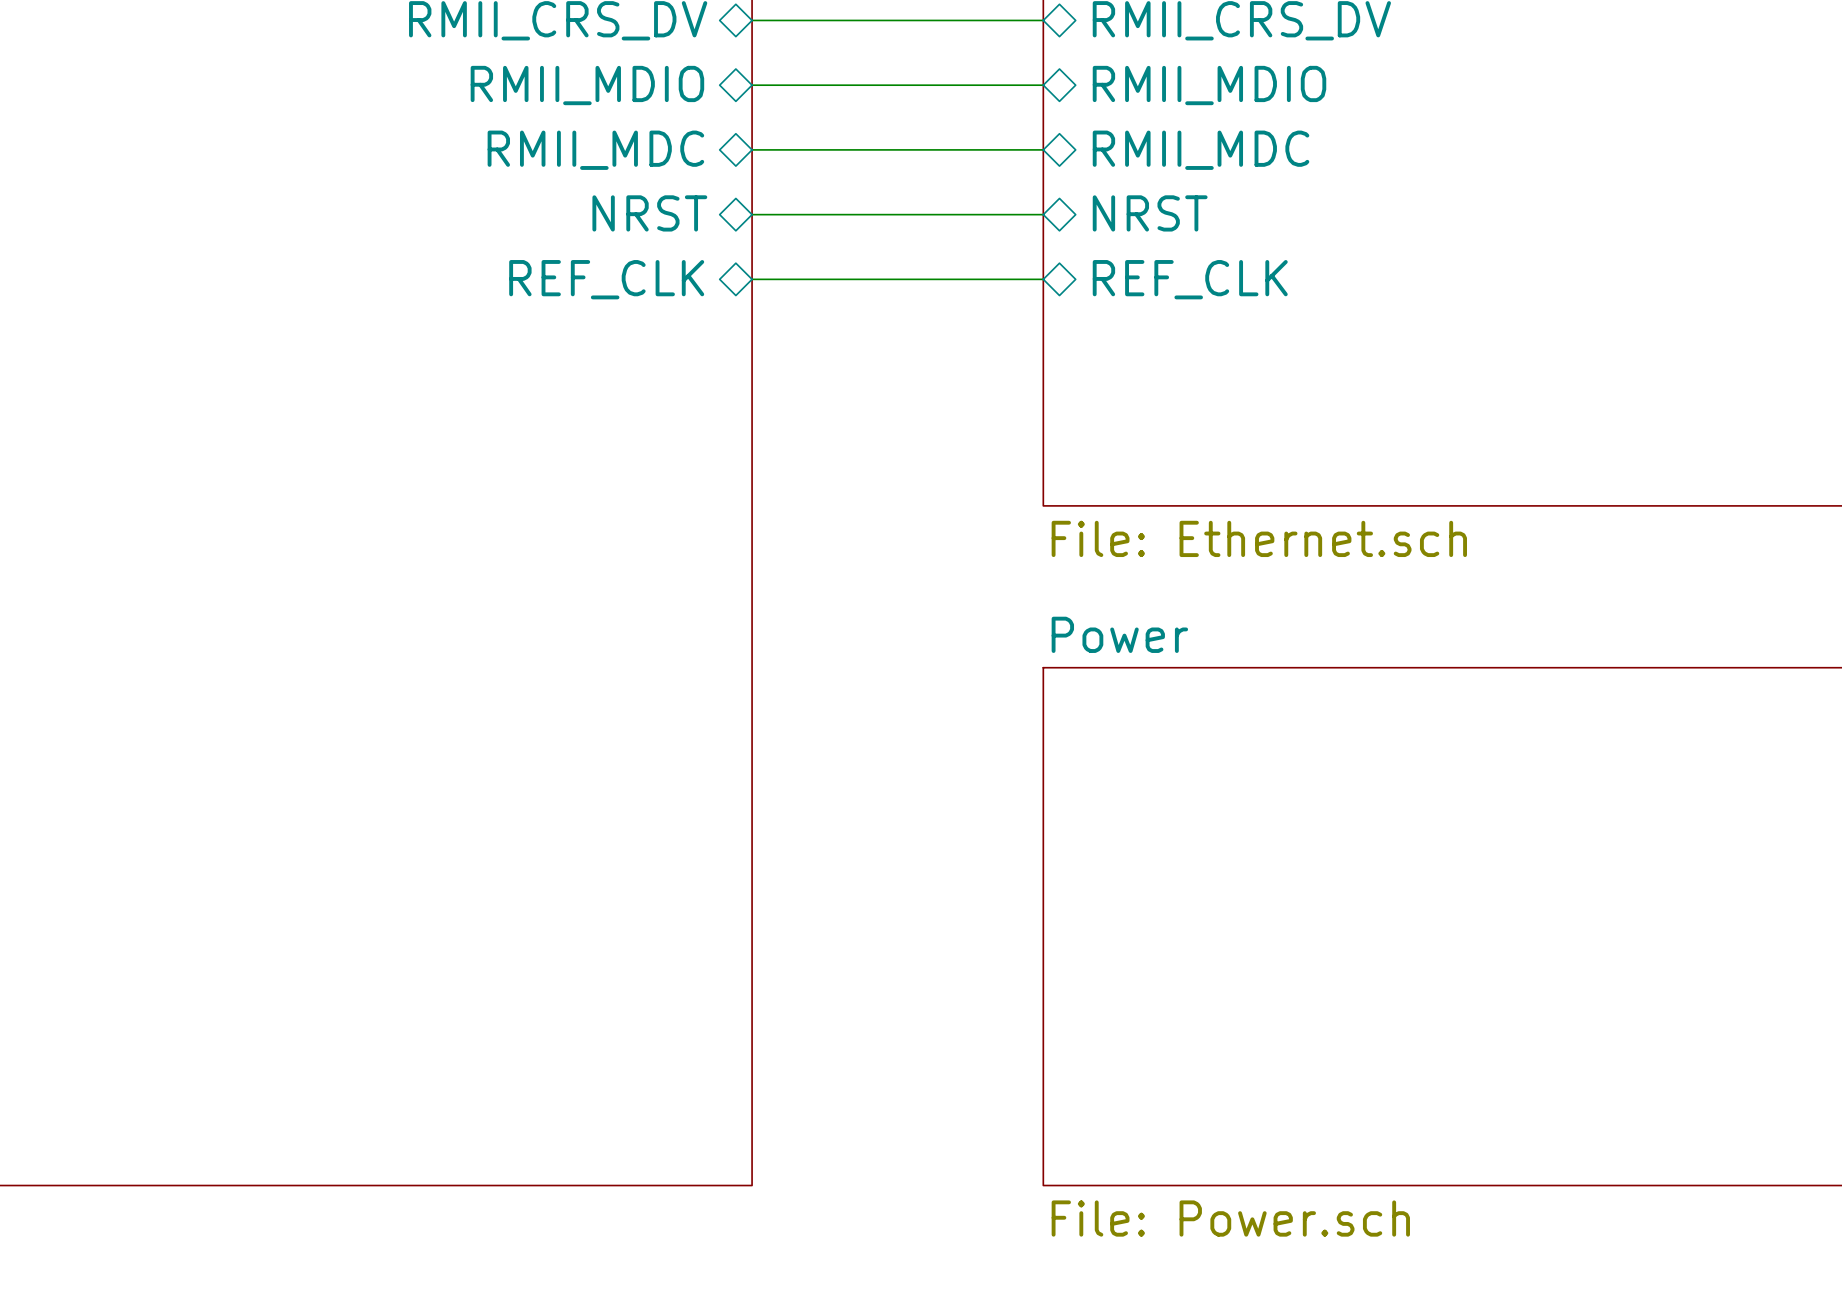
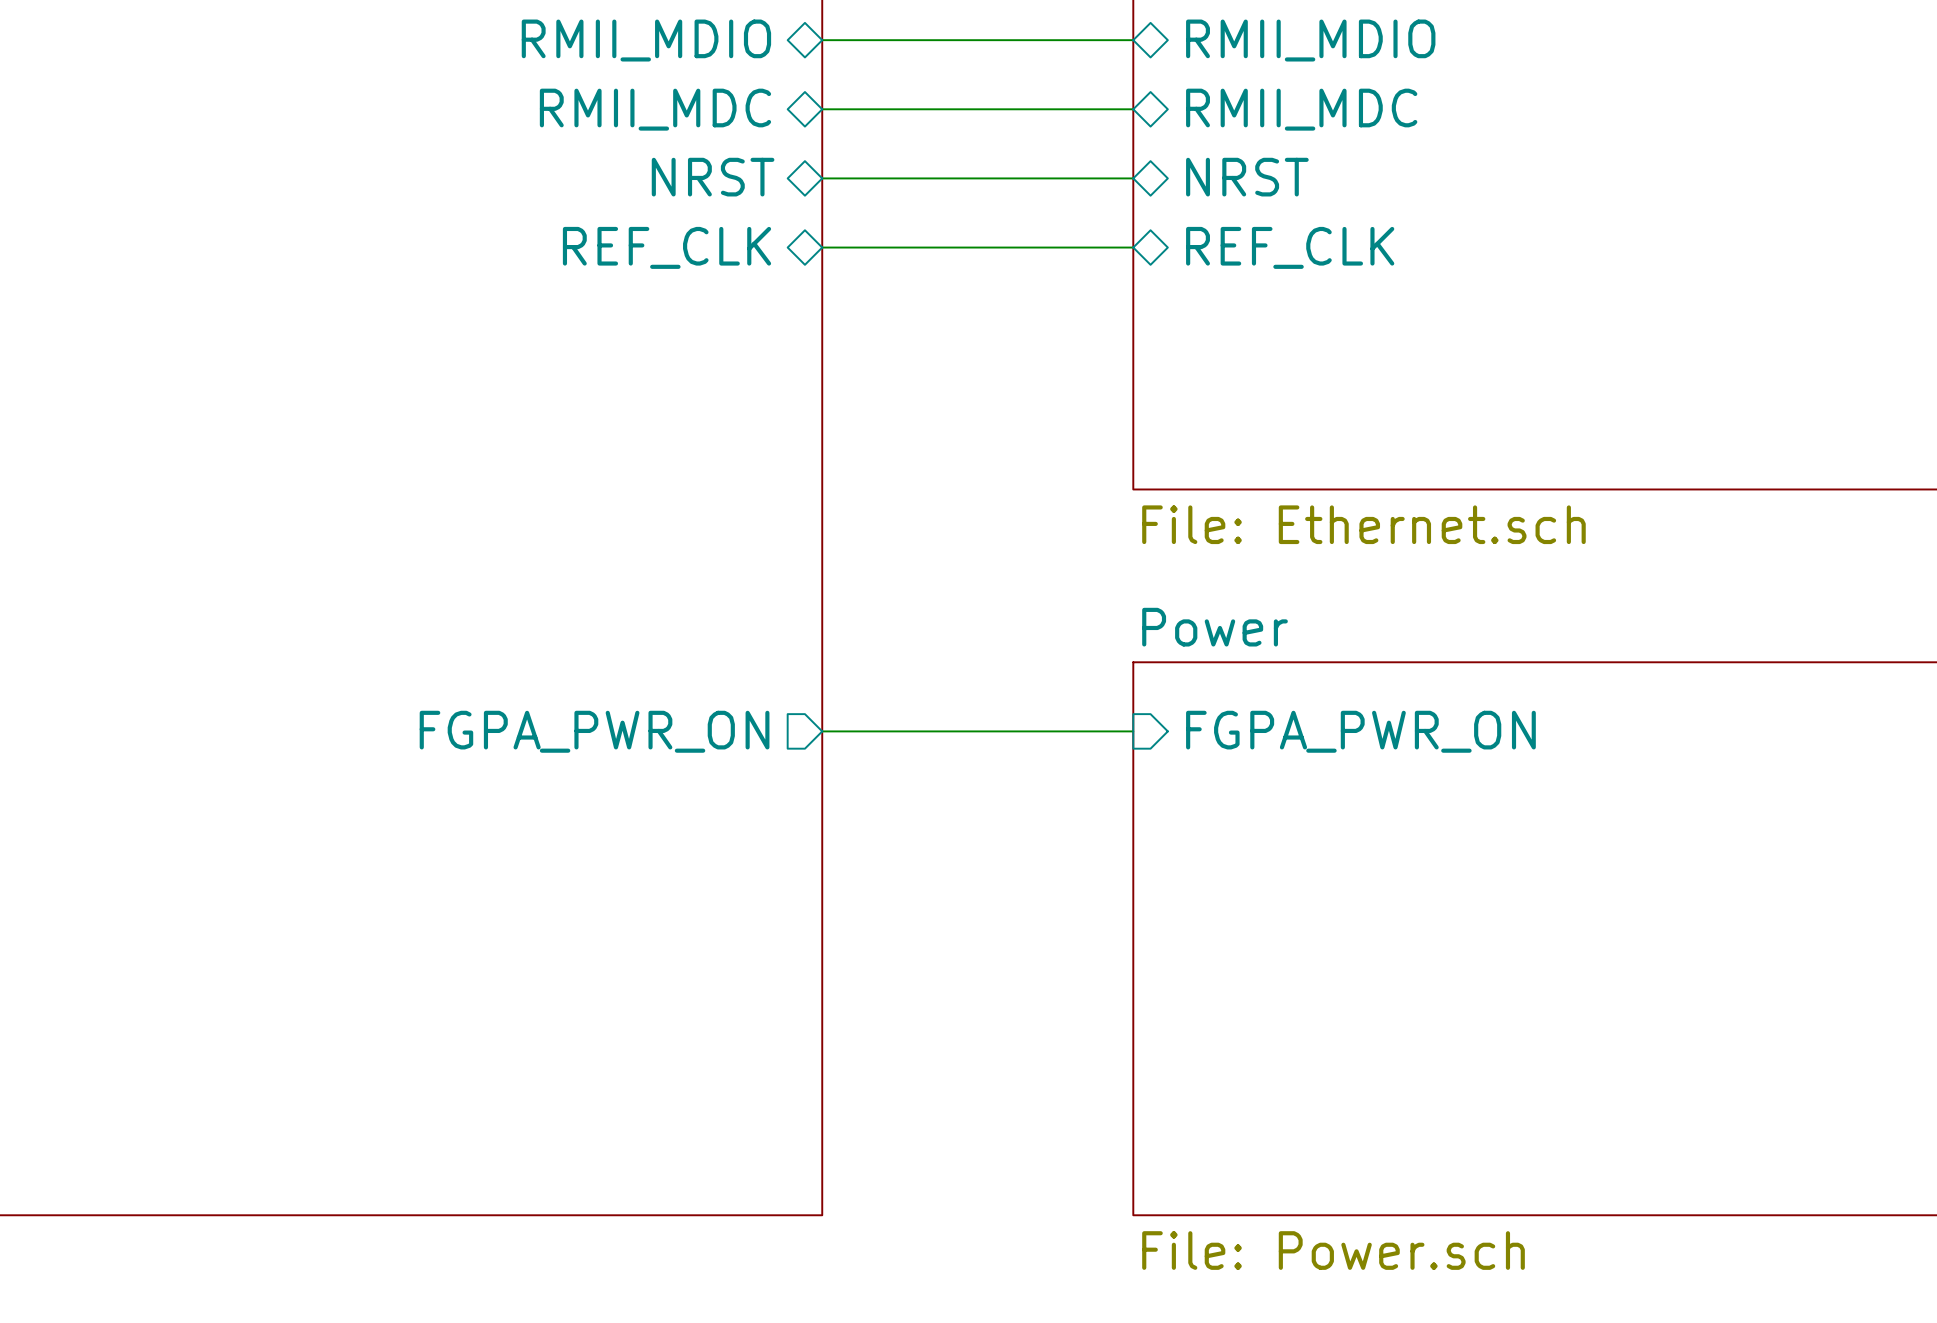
sheet pin: none -> FGPA_PWR_ON (594, 731)
wire: none -> (822, 731) (1133, 731)
sheet pin: none -> FGPA_PWR_ON (1360, 731)

